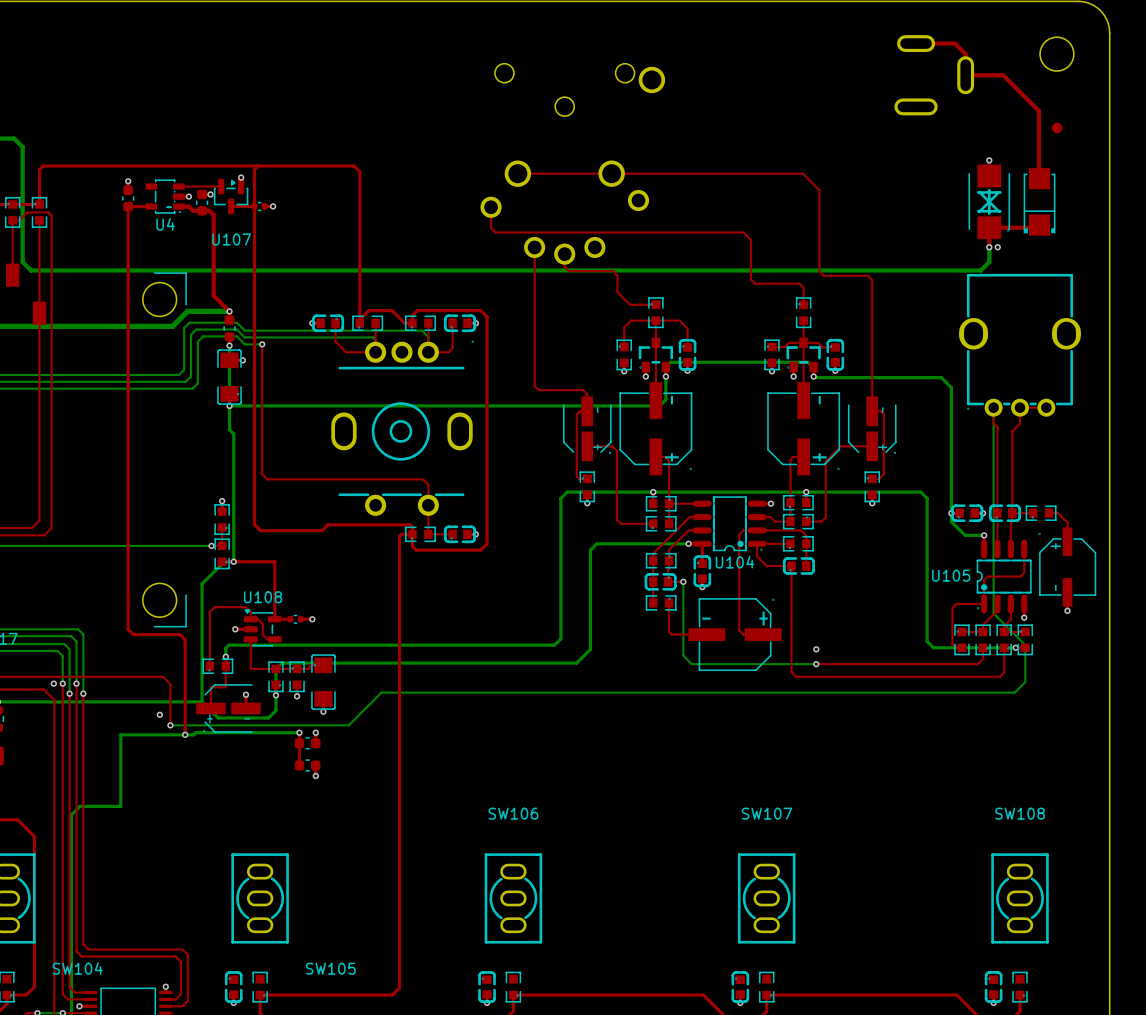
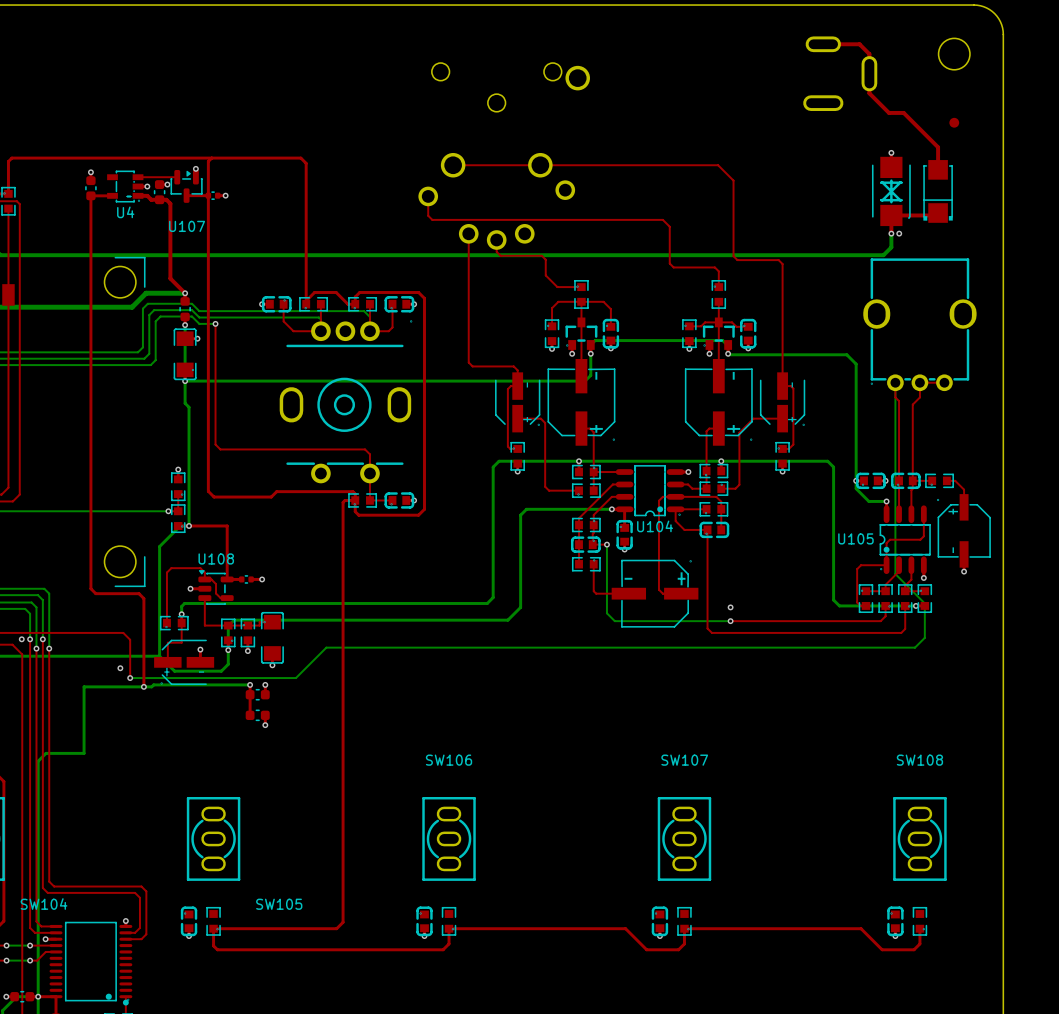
top track: (965, 75) (1003, 75) (1039, 111) (1039, 178) -> (869, 73) (869, 93) (889, 112) (903, 112) (938, 147) (938, 169)

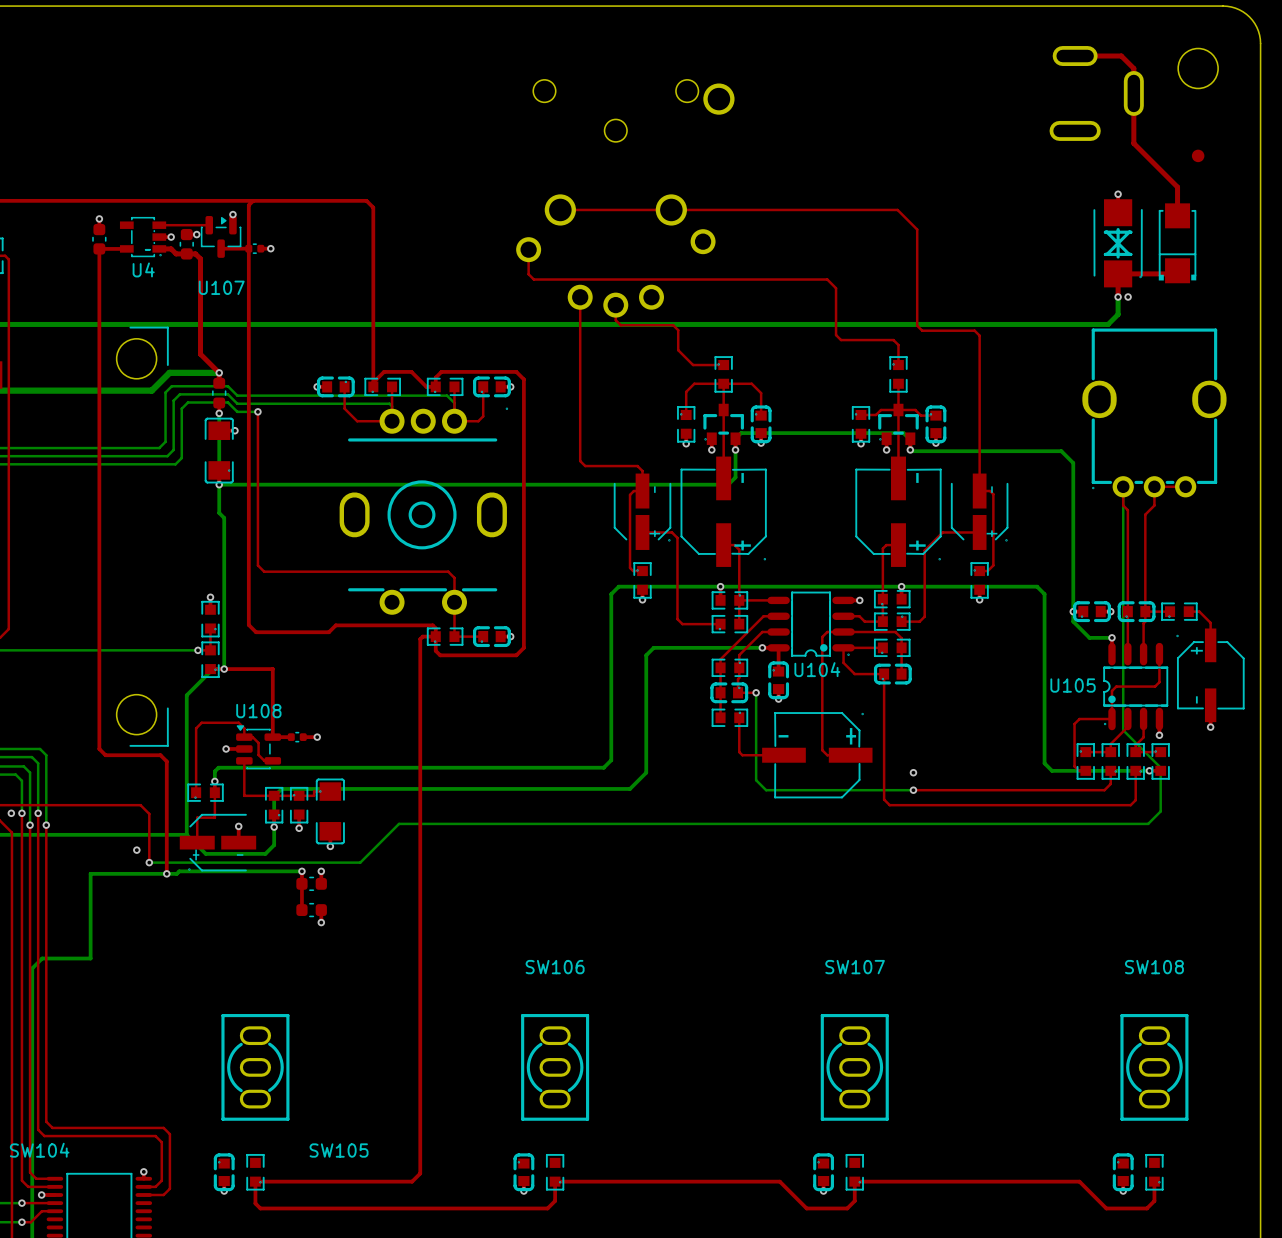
top track: (823, 44) (857, 44) -> none
top track: (859, 44) (869, 54) (869, 93) (889, 112) (903, 112) -> (1077, 56) (1121, 56) (1133, 68) (1133, 143)
part position: (840, 73) -> (1096, 93)

